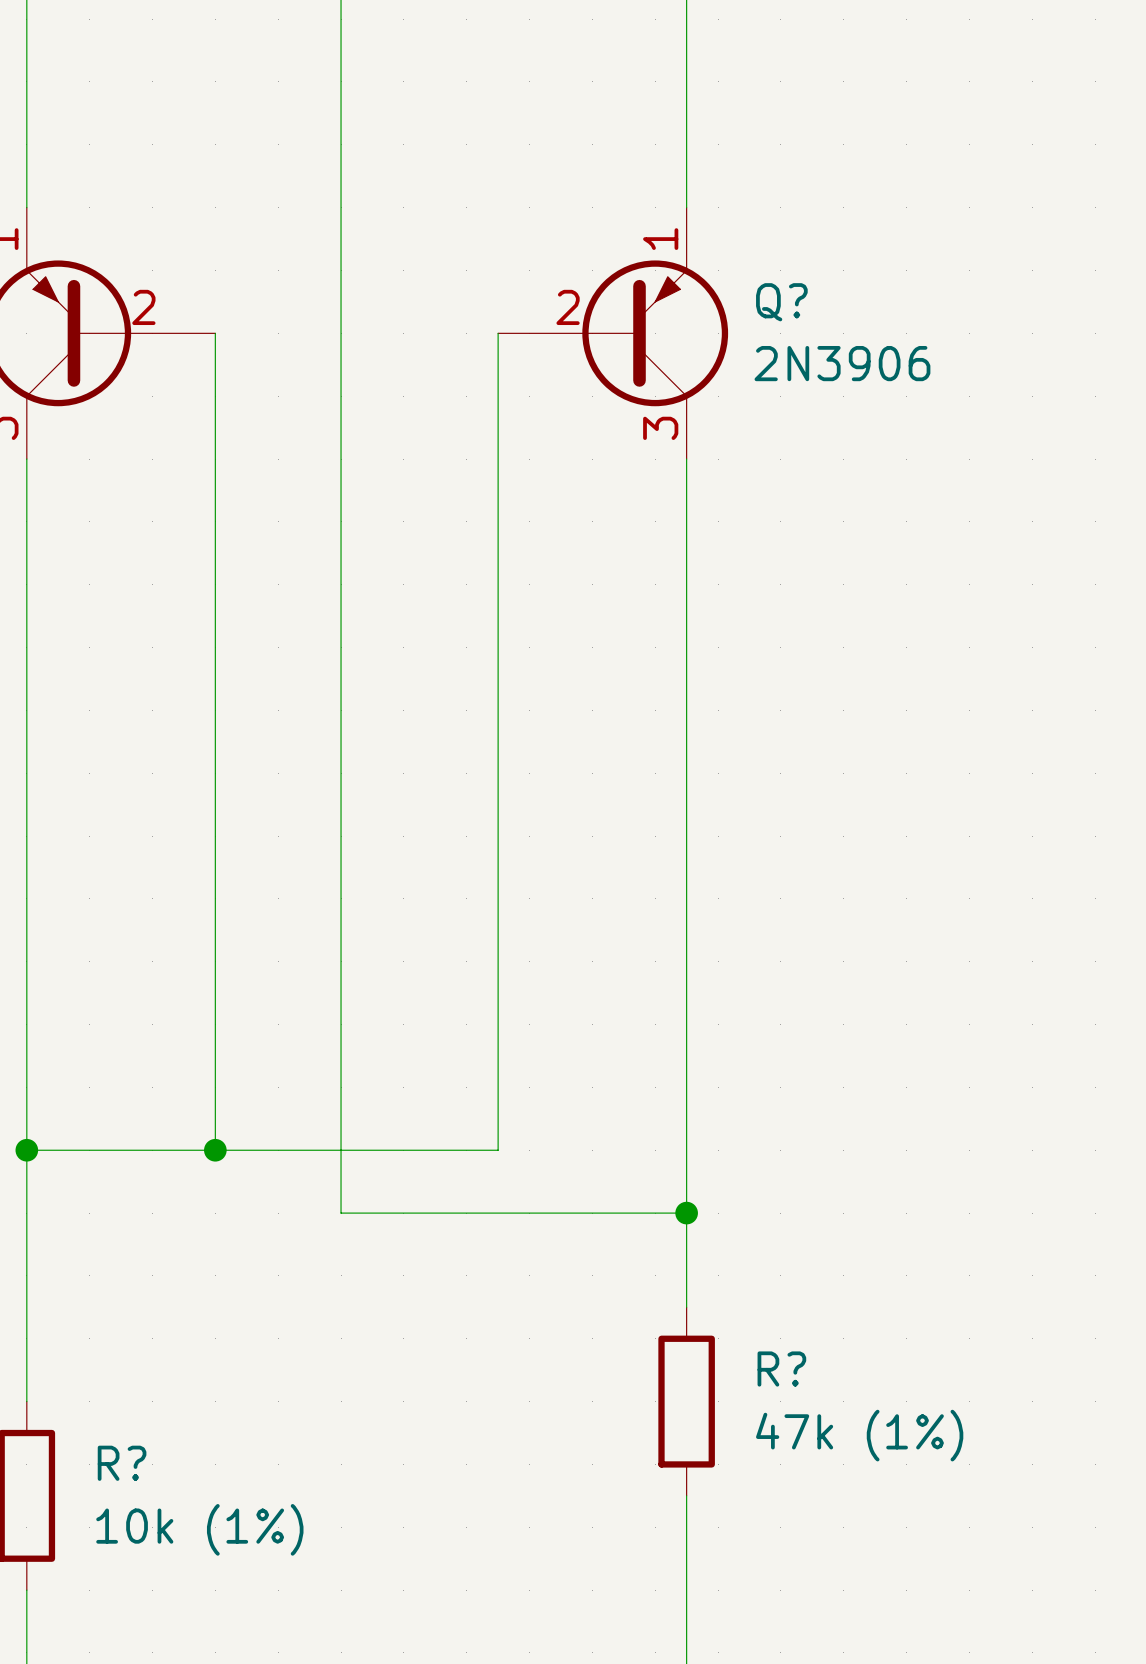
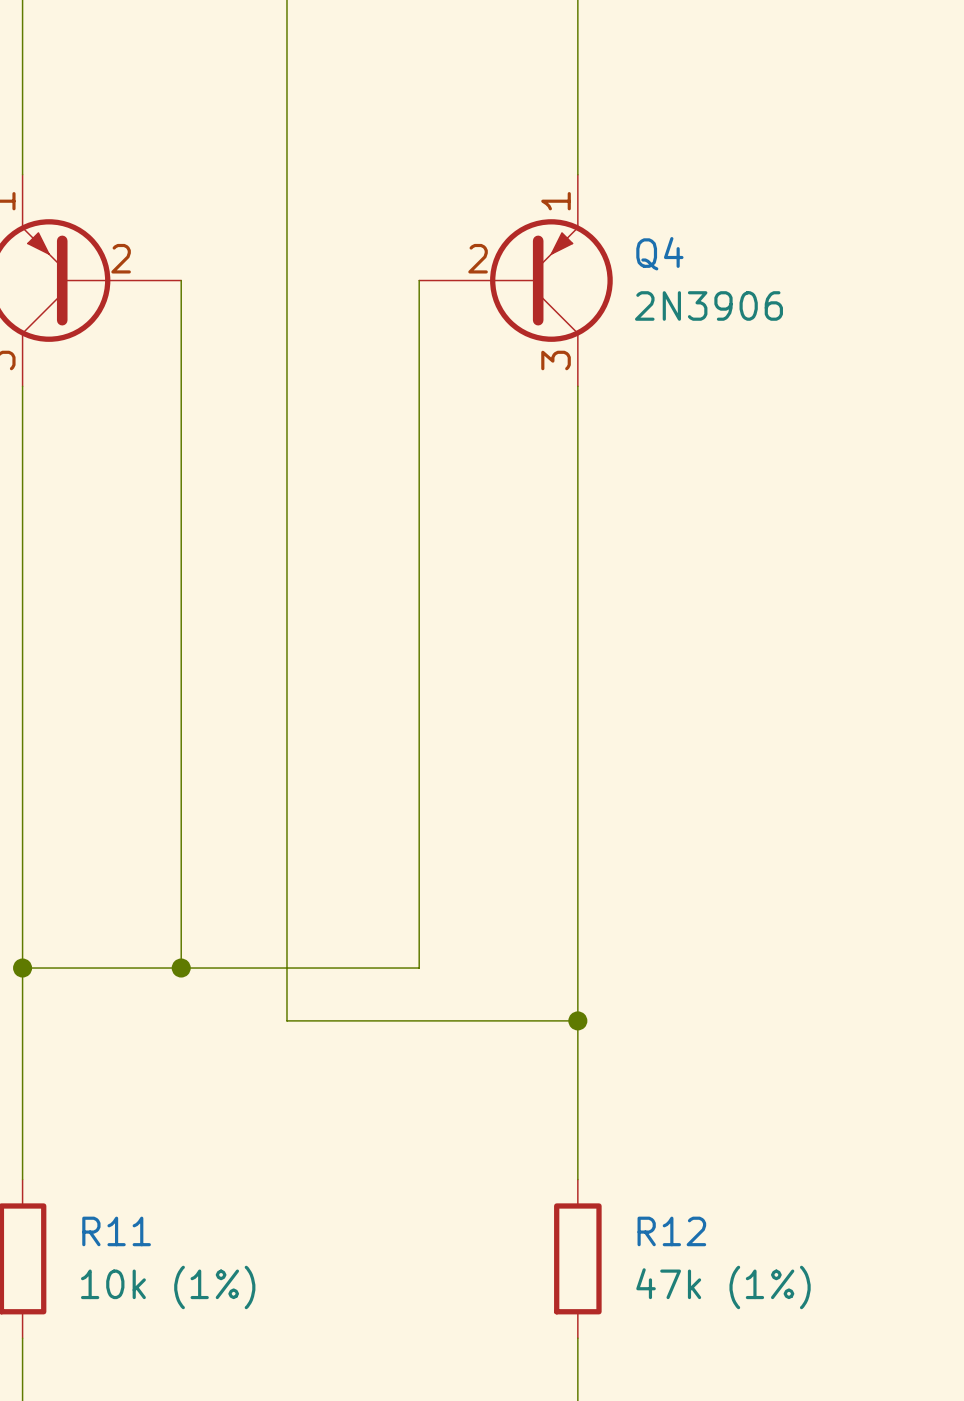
Q? name: Q? (781, 302) -> Q4 (659, 253)
R?: 47k (1%) (686, 1401) -> none
R? name: R? (122, 1463) -> R11 (116, 1231)
wire: (686, 1495) (686, 1590) -> (577, 1100) (577, 1179)
R12: none -> 47k (1%) (577, 1258)

